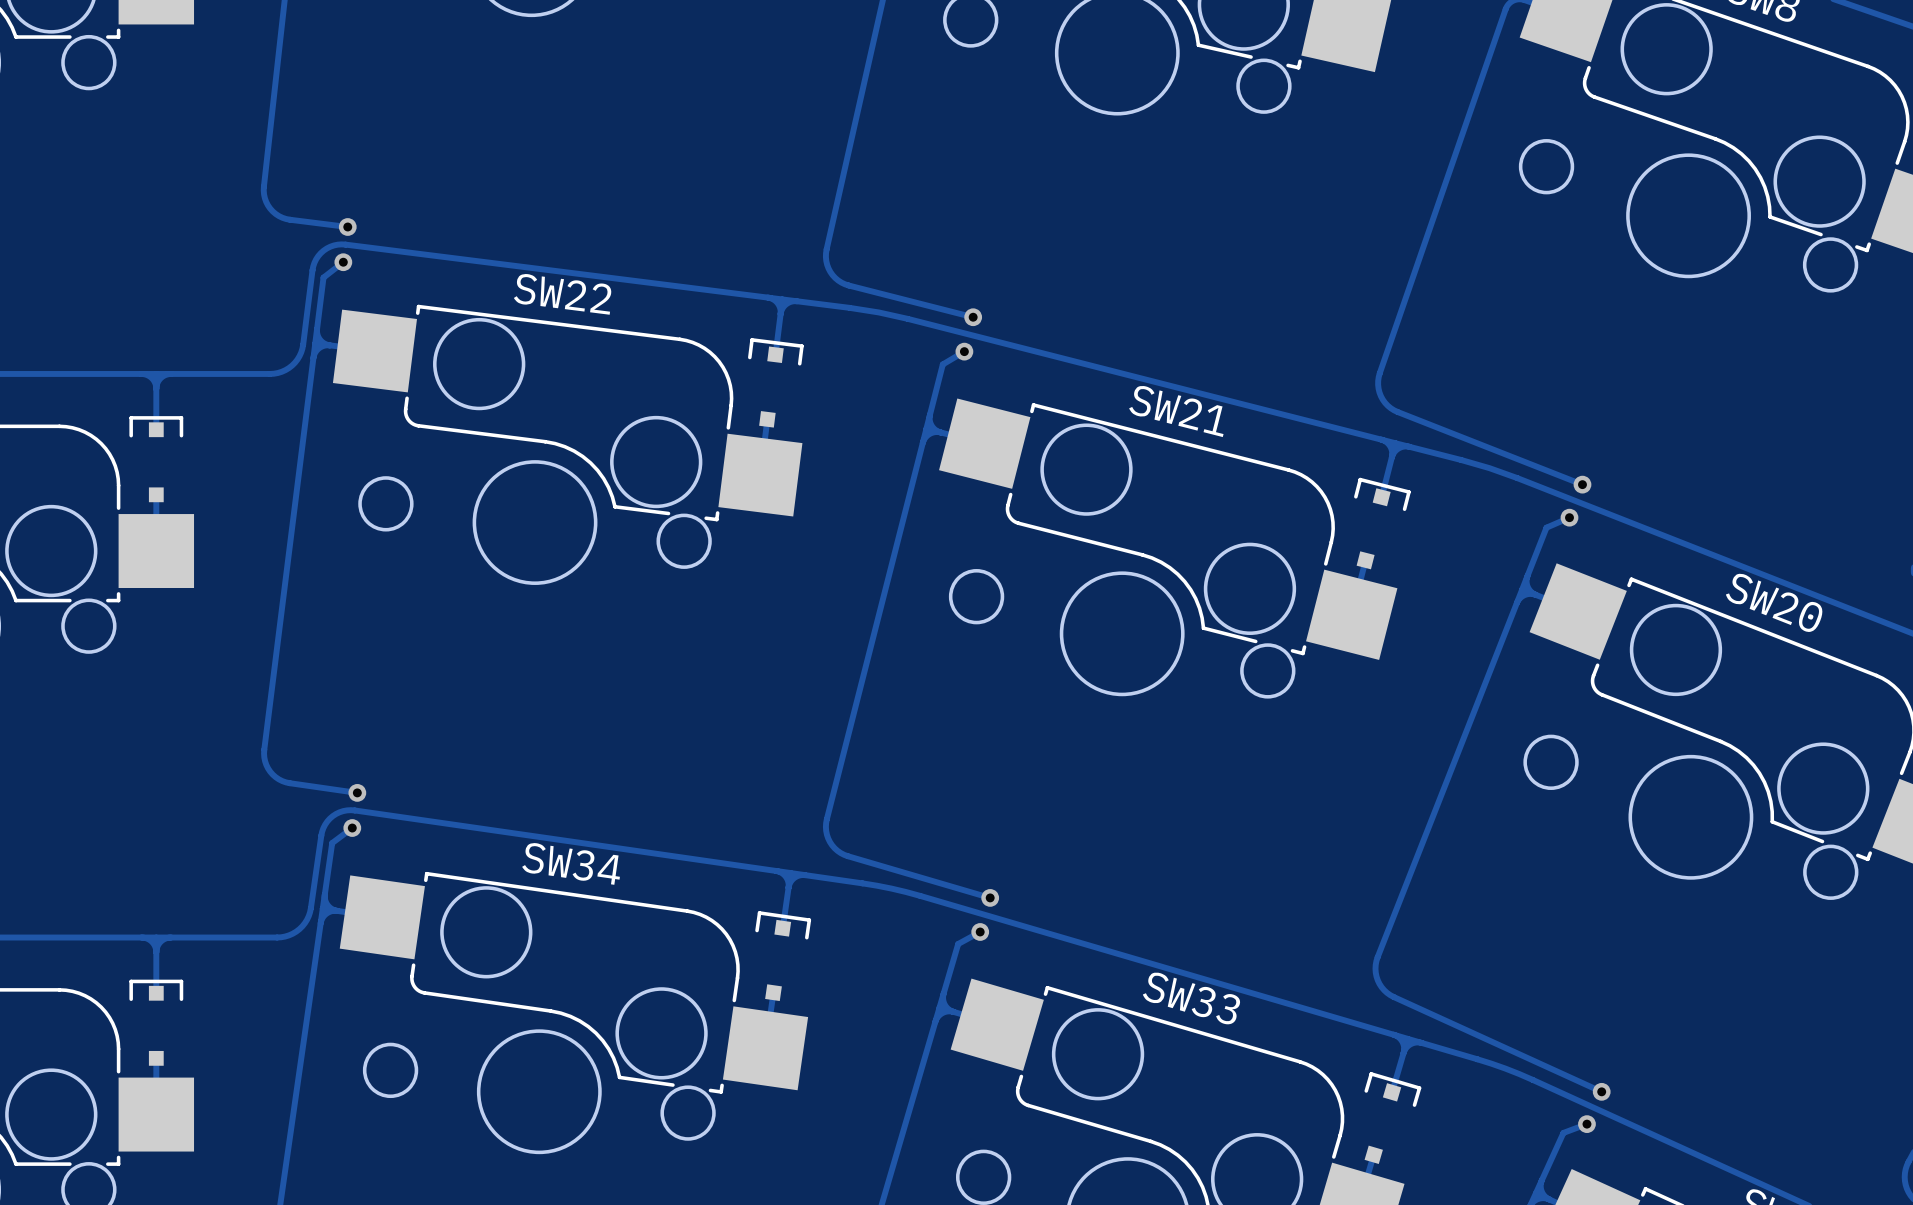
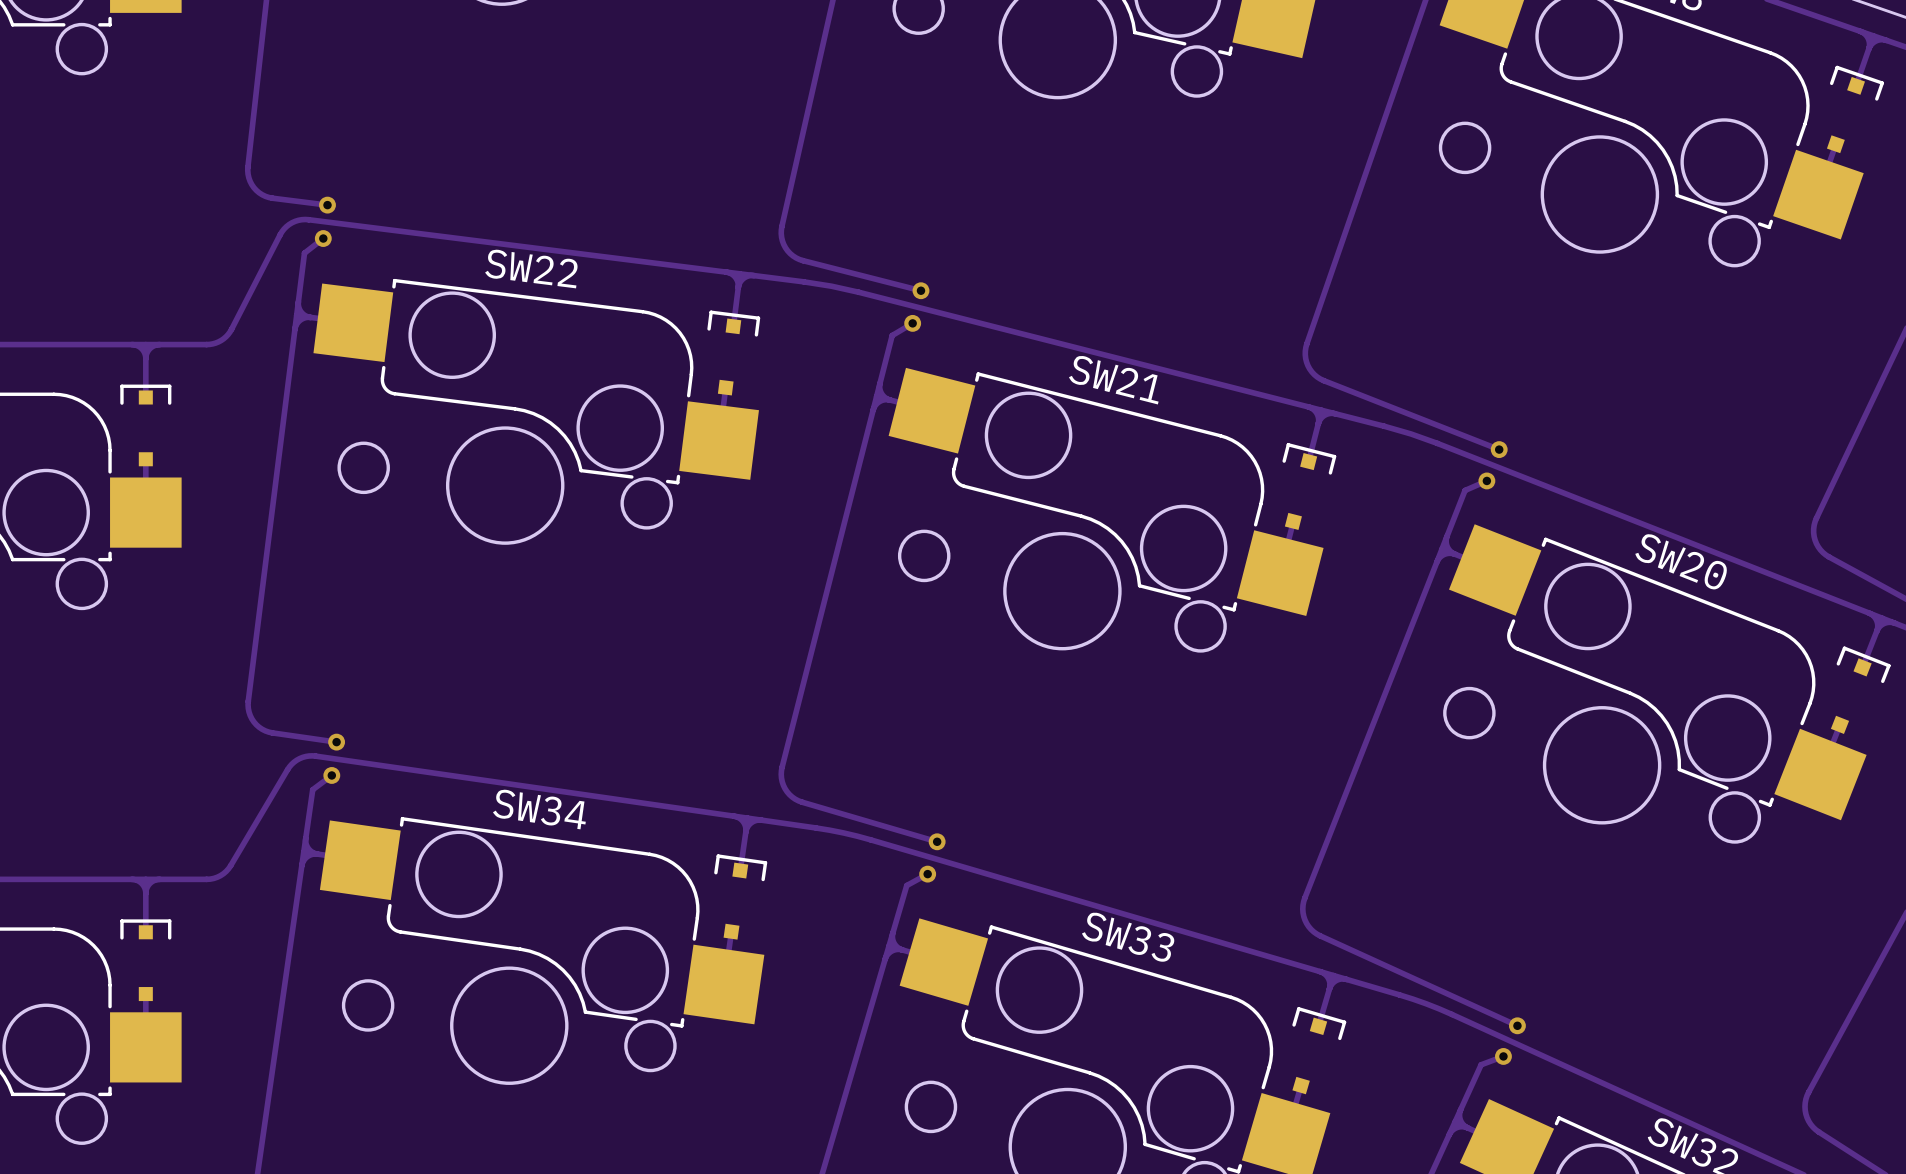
track: (345, 244) (334, 245) (326, 248) (318, 256) (314, 262) (302, 348) (294, 362) (285, 370) (273, 373) (220, 373) -> (325, 221) (301, 219) (292, 222) (284, 229) (230, 331) (221, 340) (206, 344)
track: (354, 810) (347, 810) (336, 813) (329, 818) (323, 828) (310, 912) (299, 929) (281, 937) (220, 937) -> (334, 758) (309, 755) (299, 758) (291, 764) (228, 868) (217, 877) (206, 879)

